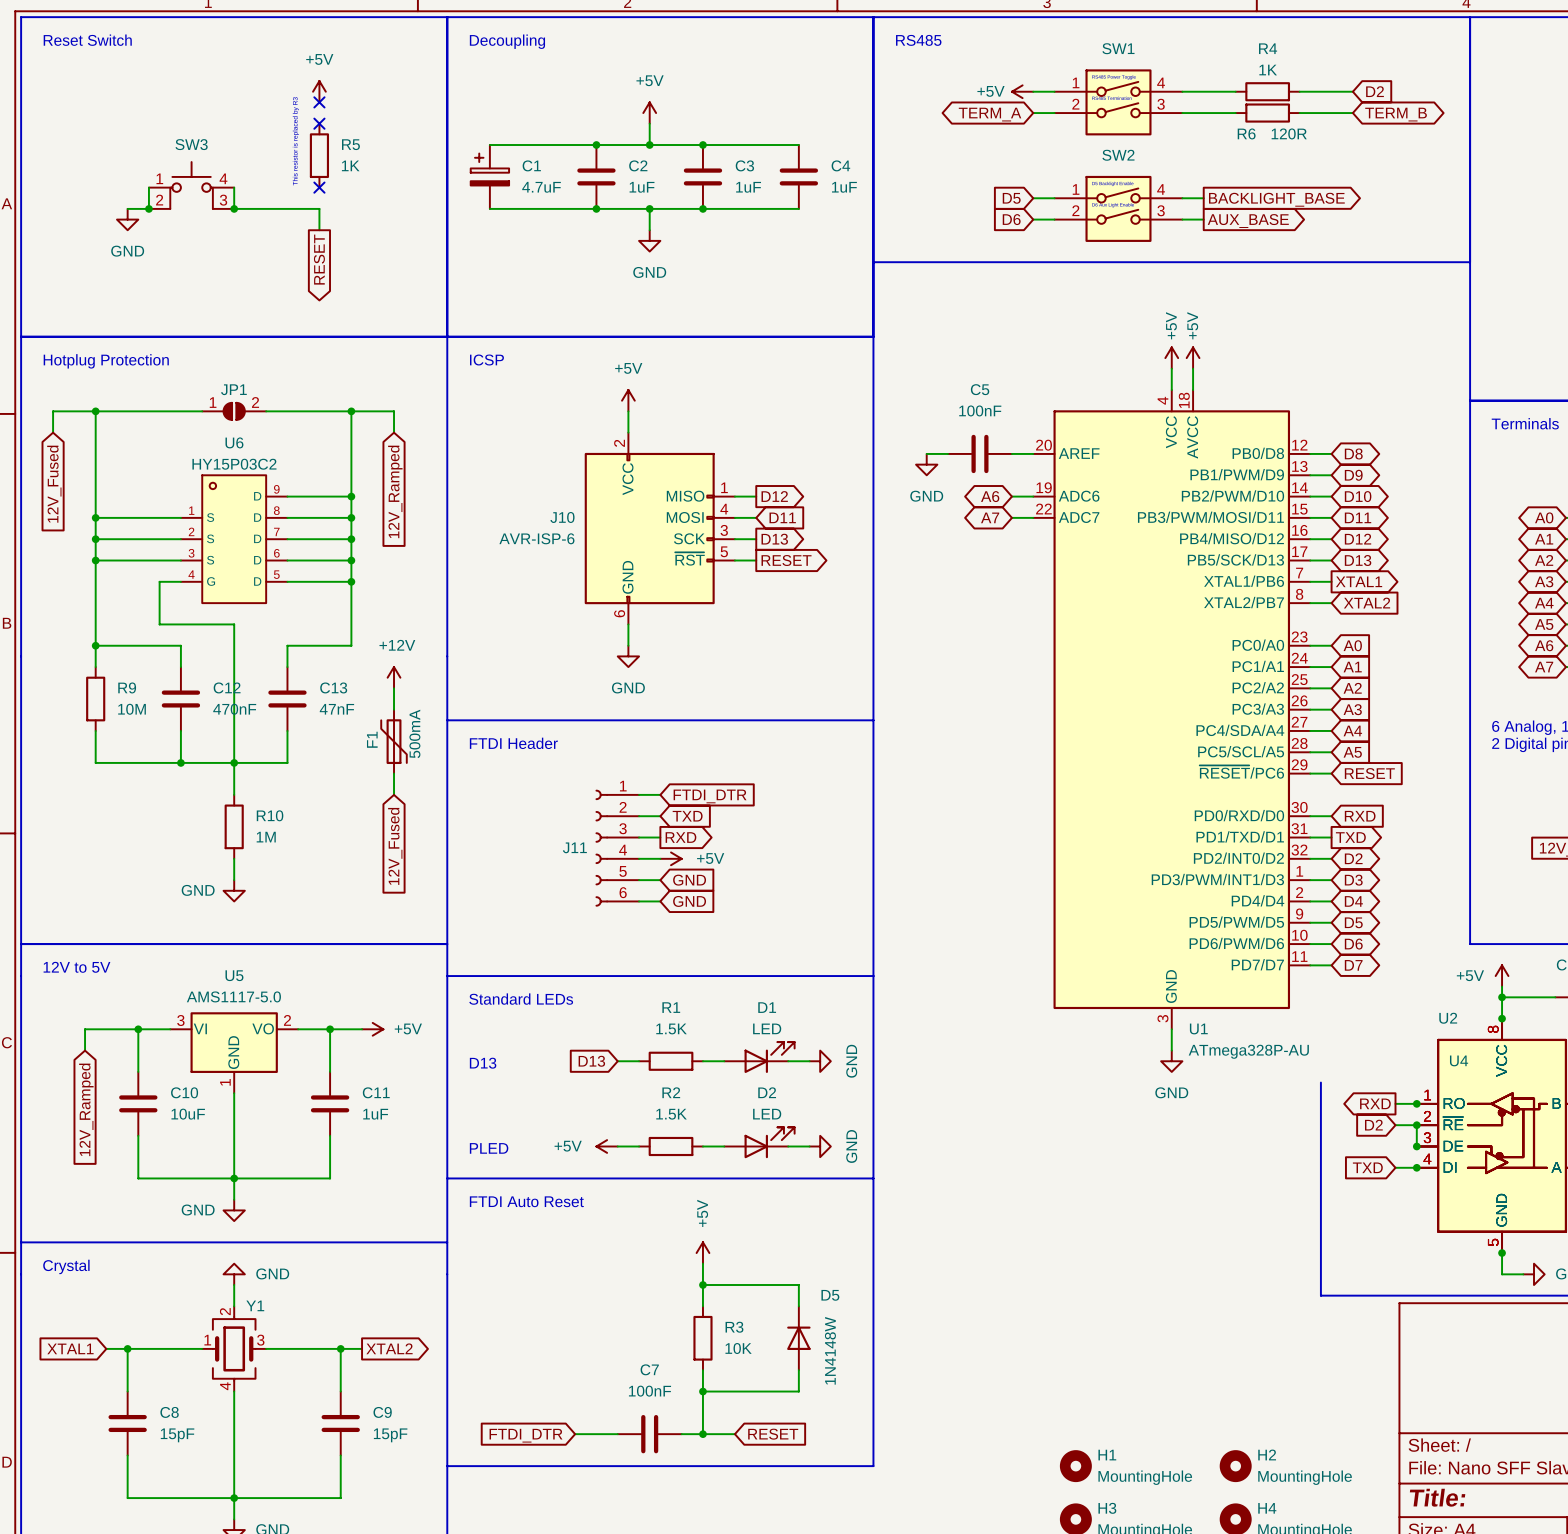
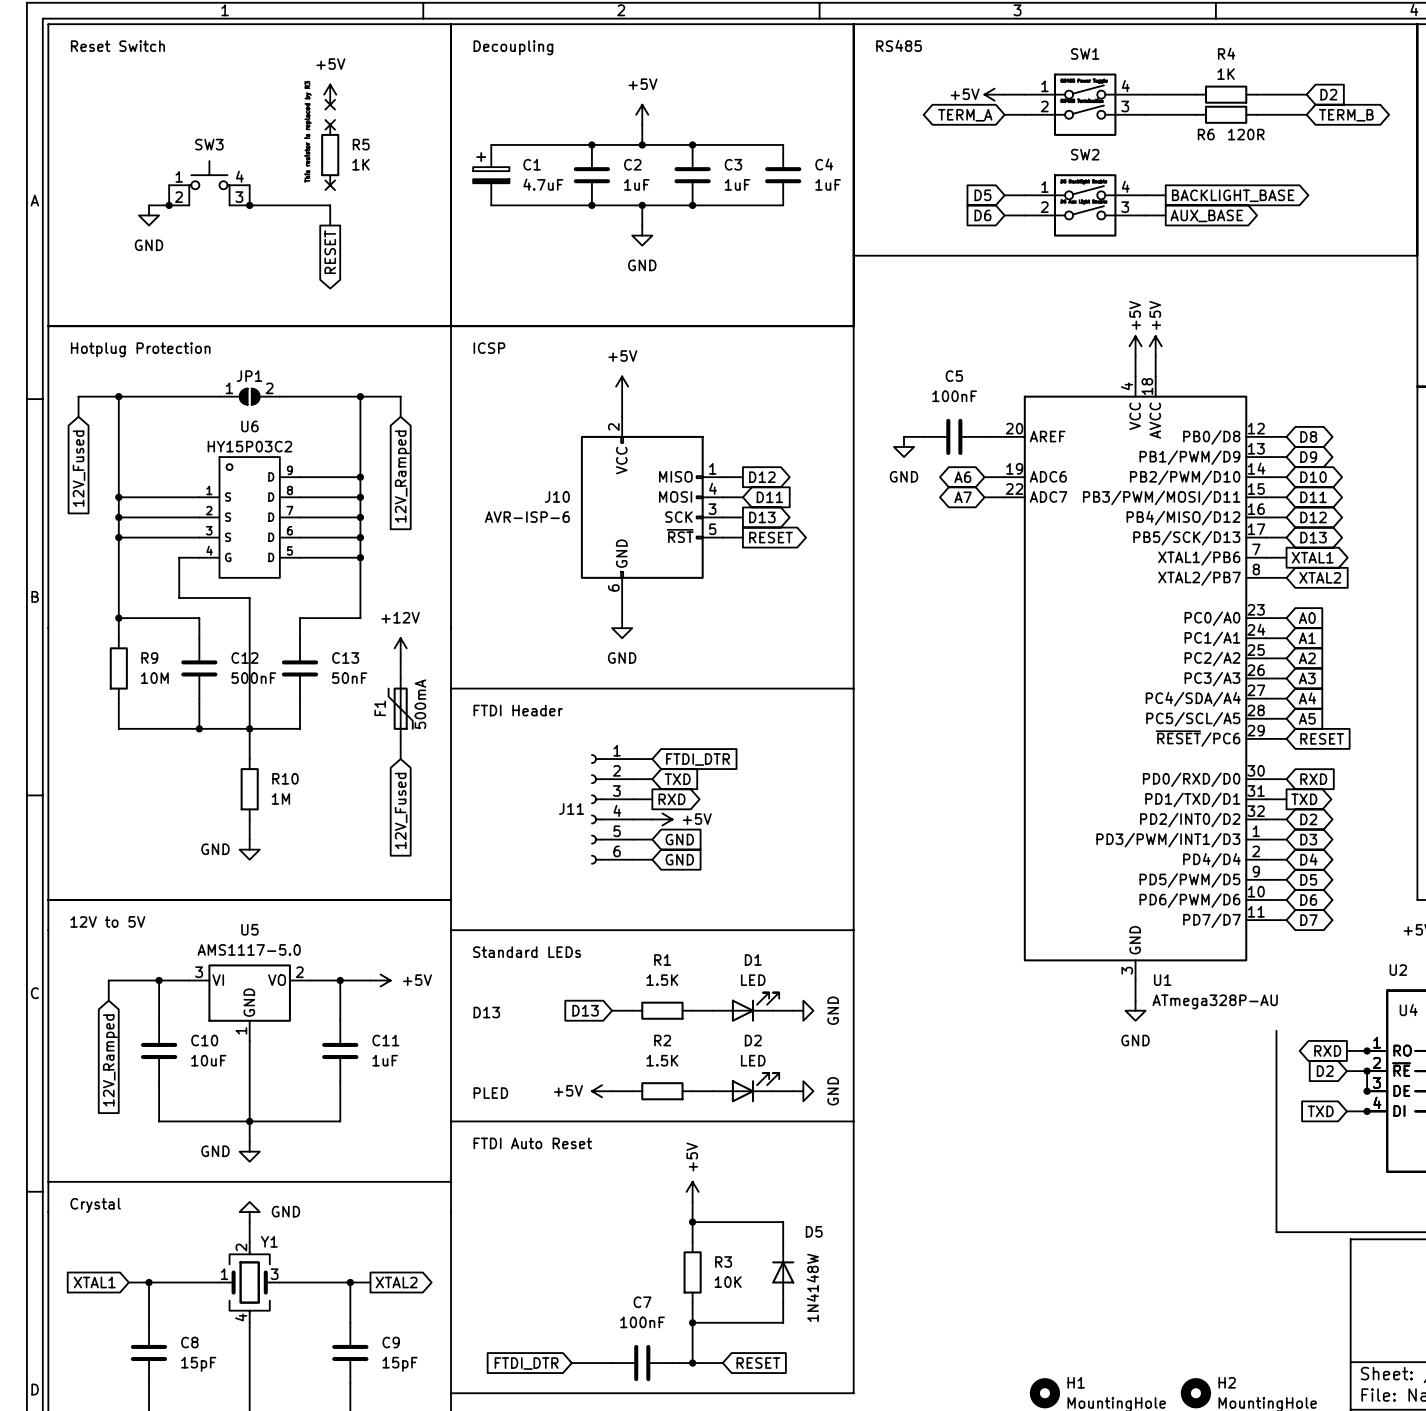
C12 value: 470nF (234, 709) -> 500nF (253, 678)
C13 value: 47nF (336, 709) -> 50nF (349, 678)

